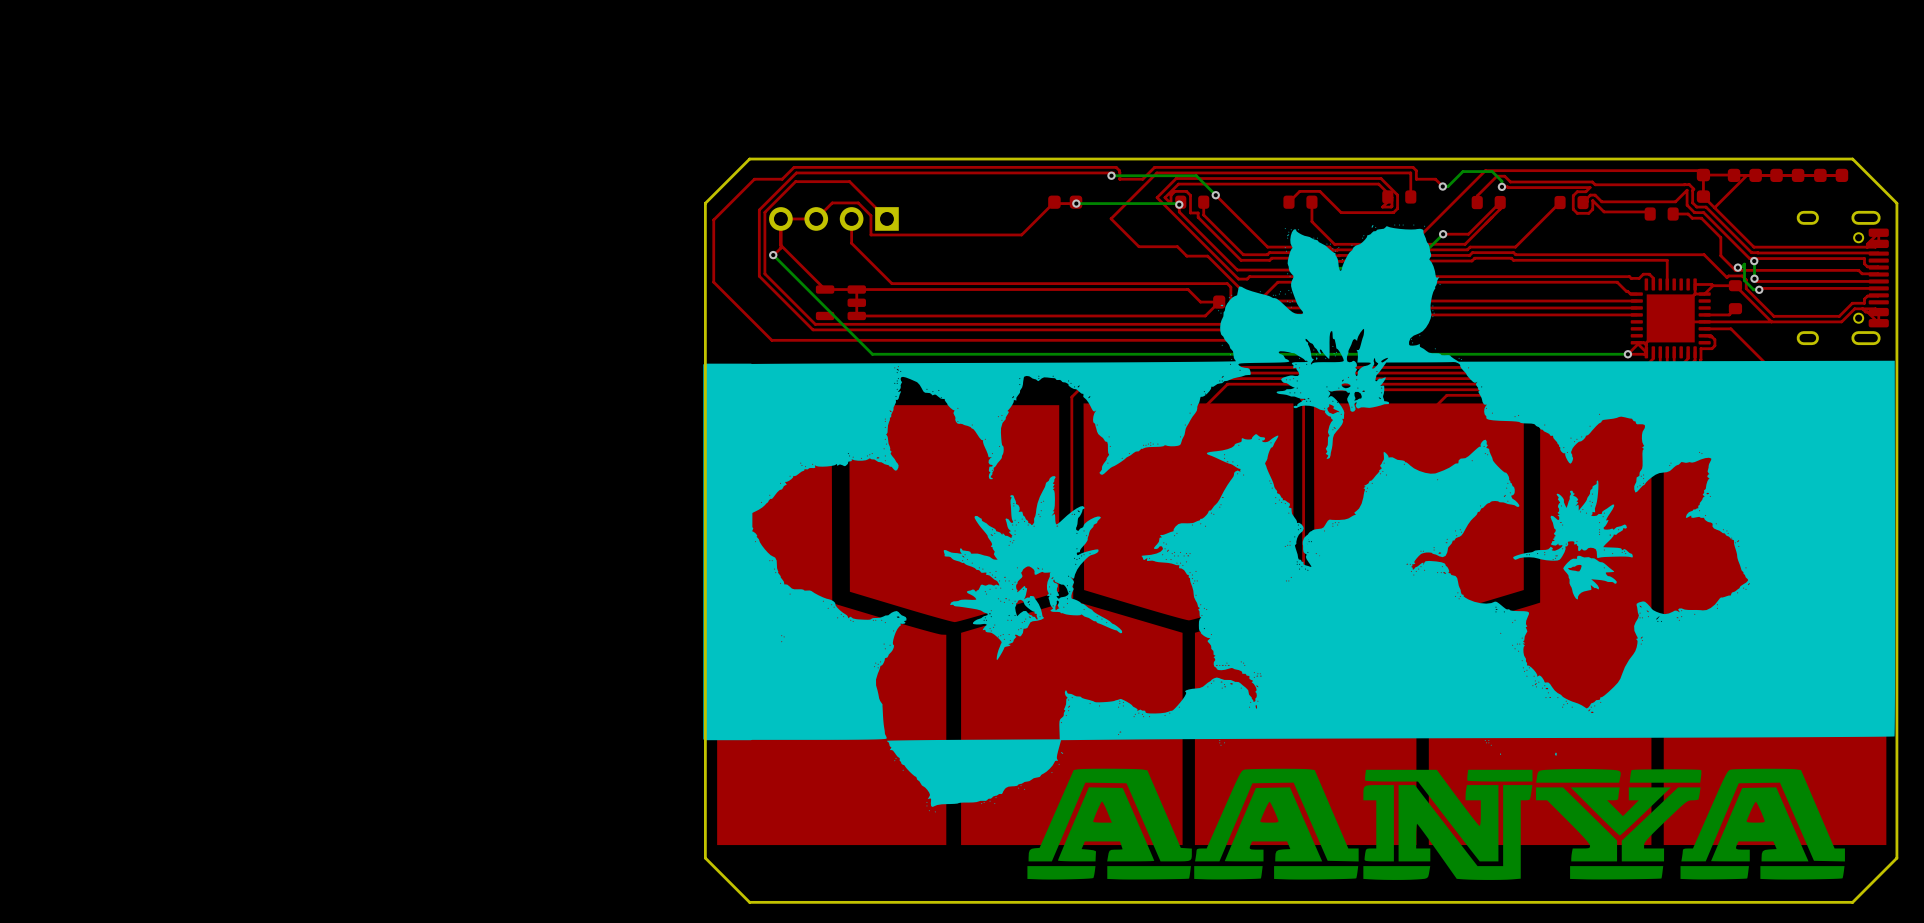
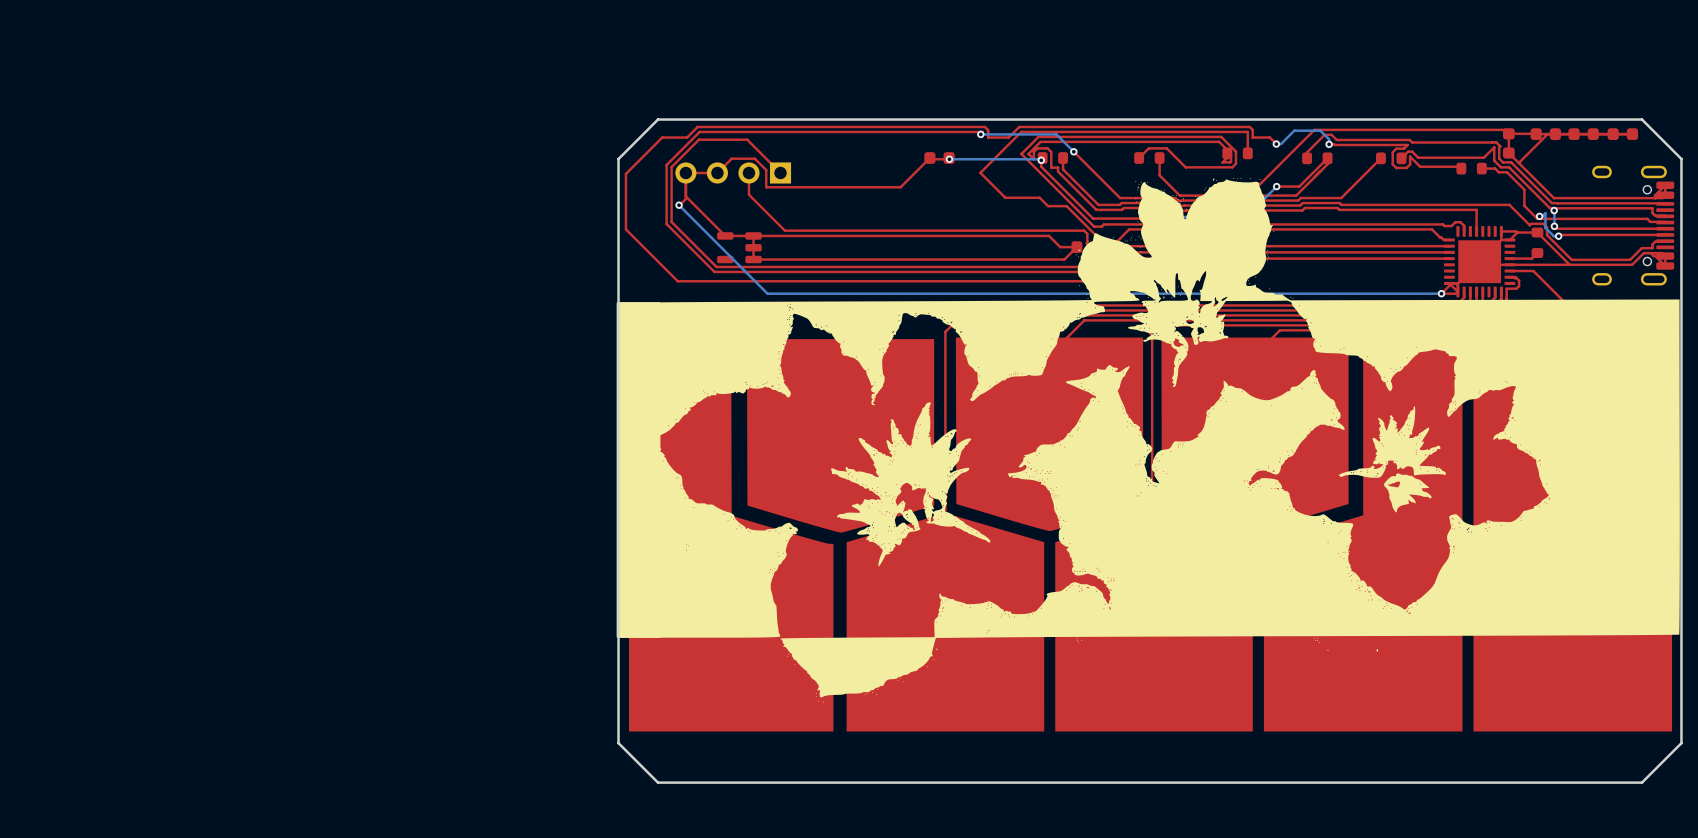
drawing: [1027, 768, 1845, 880] -> none

